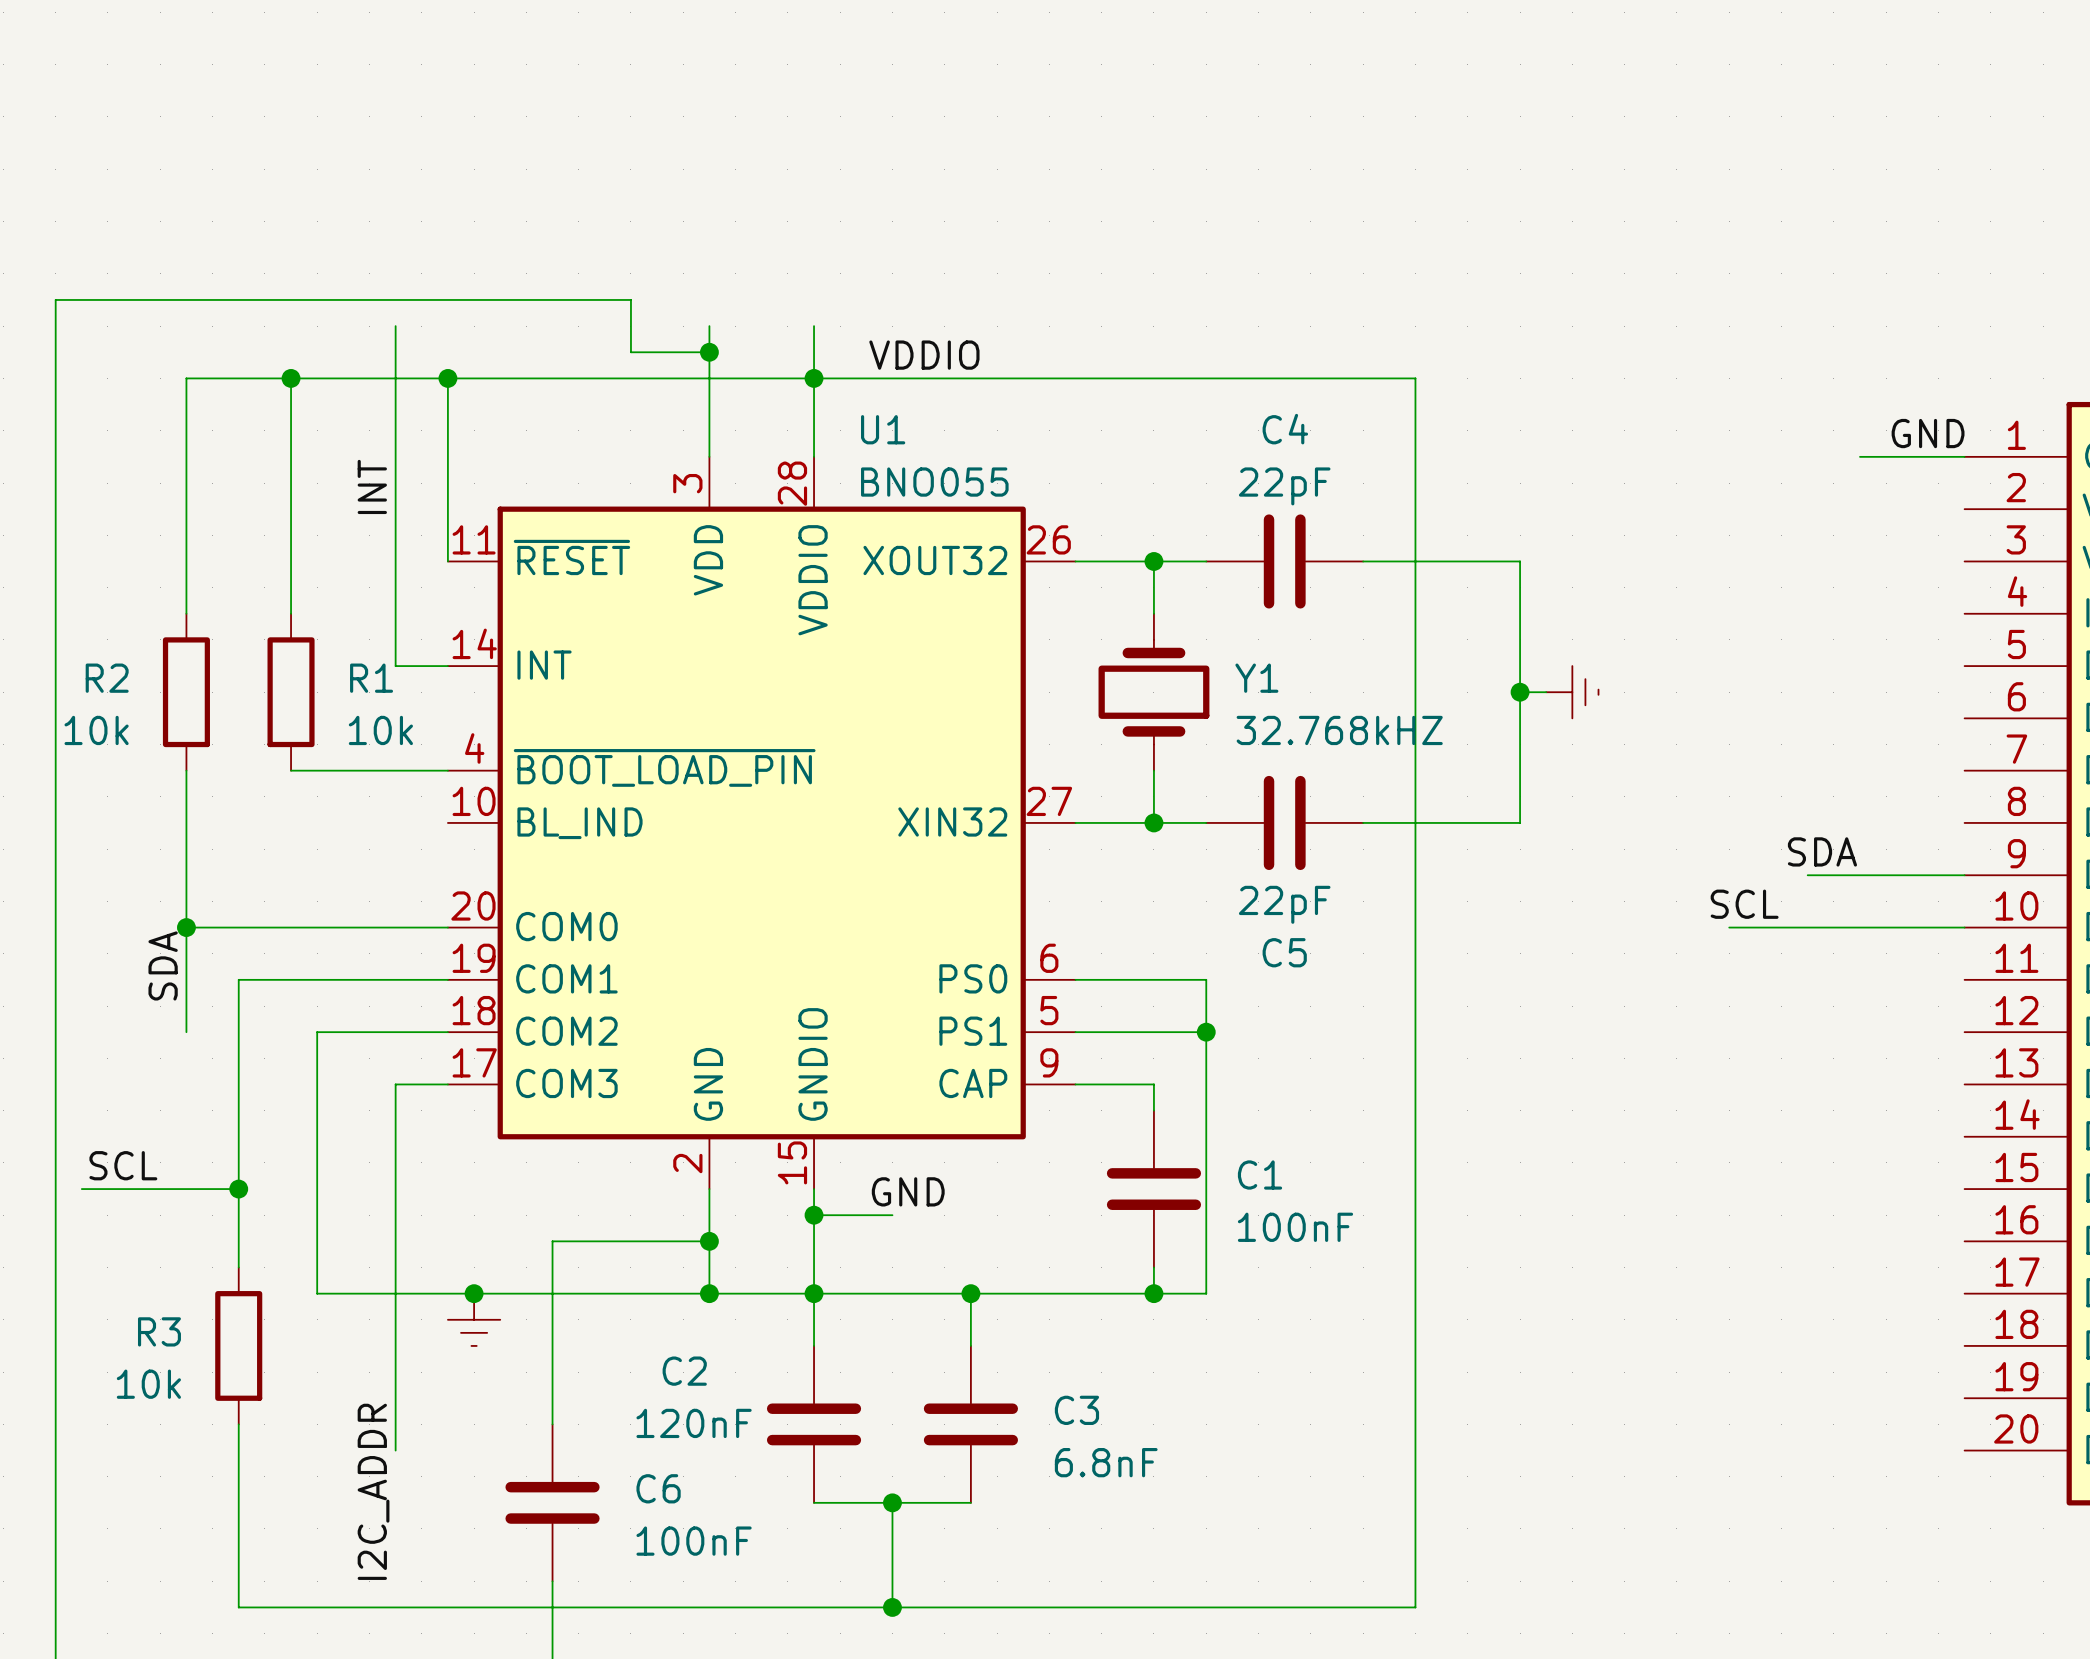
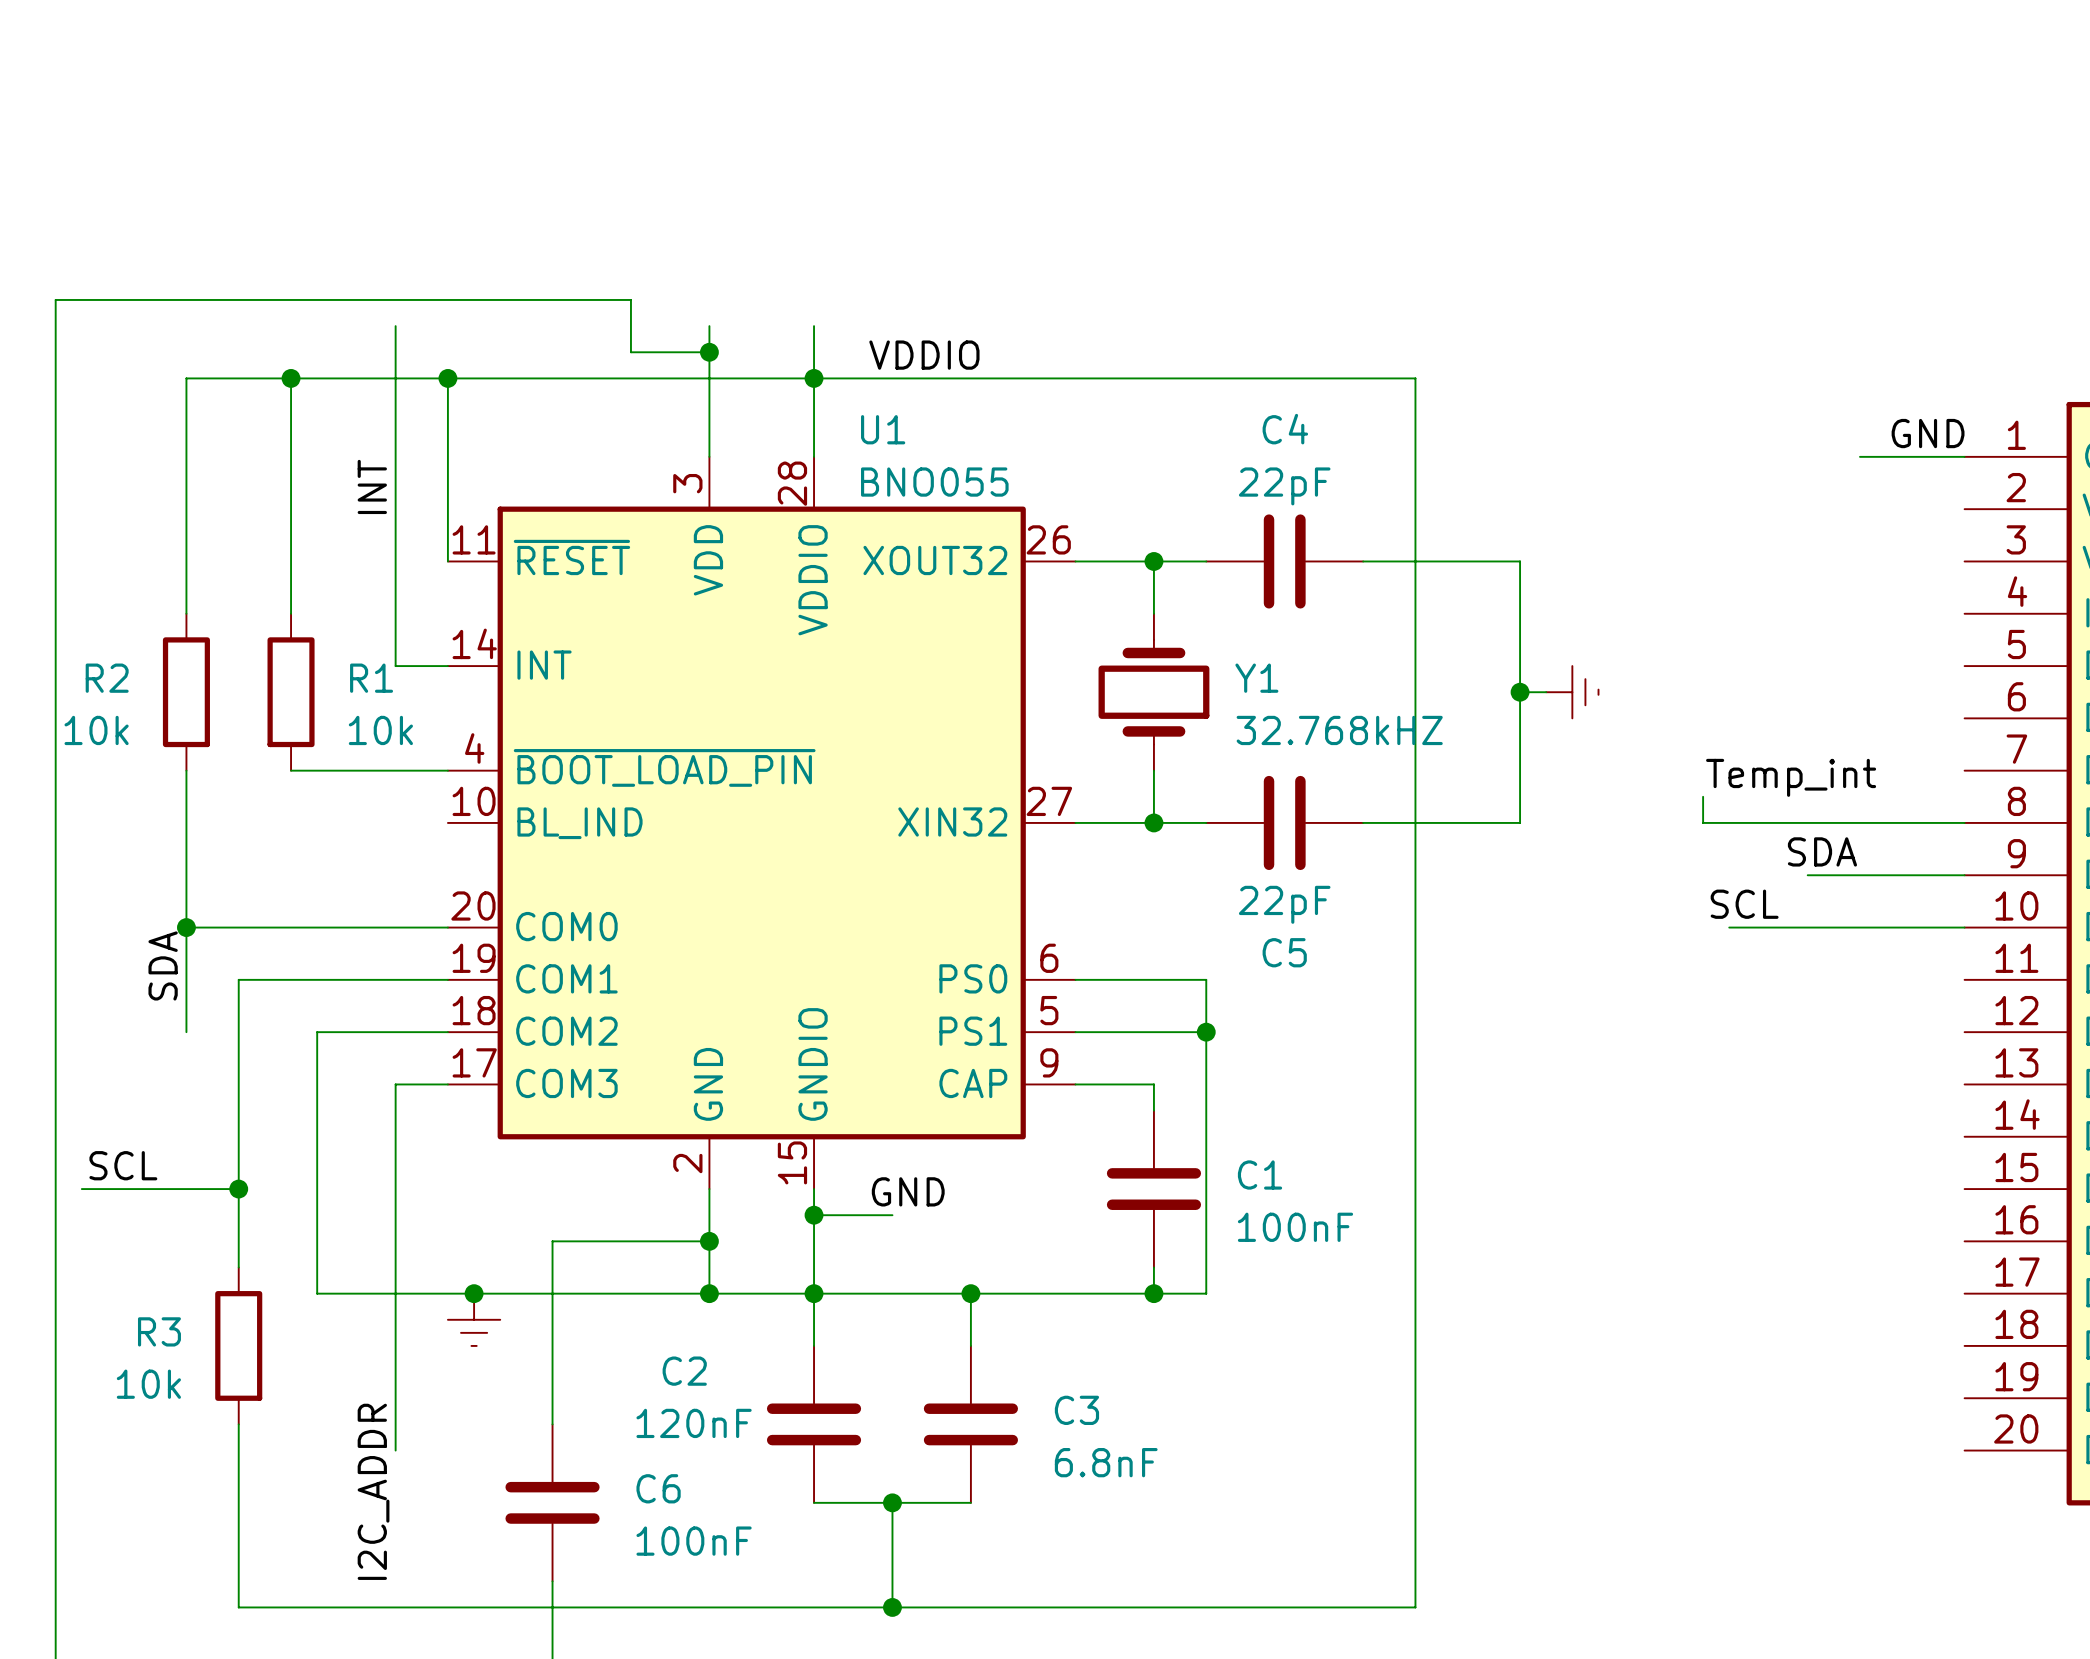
label: none -> Temp_int (1791, 777)
wire: none -> (1703, 796) (1703, 822) (1964, 822)

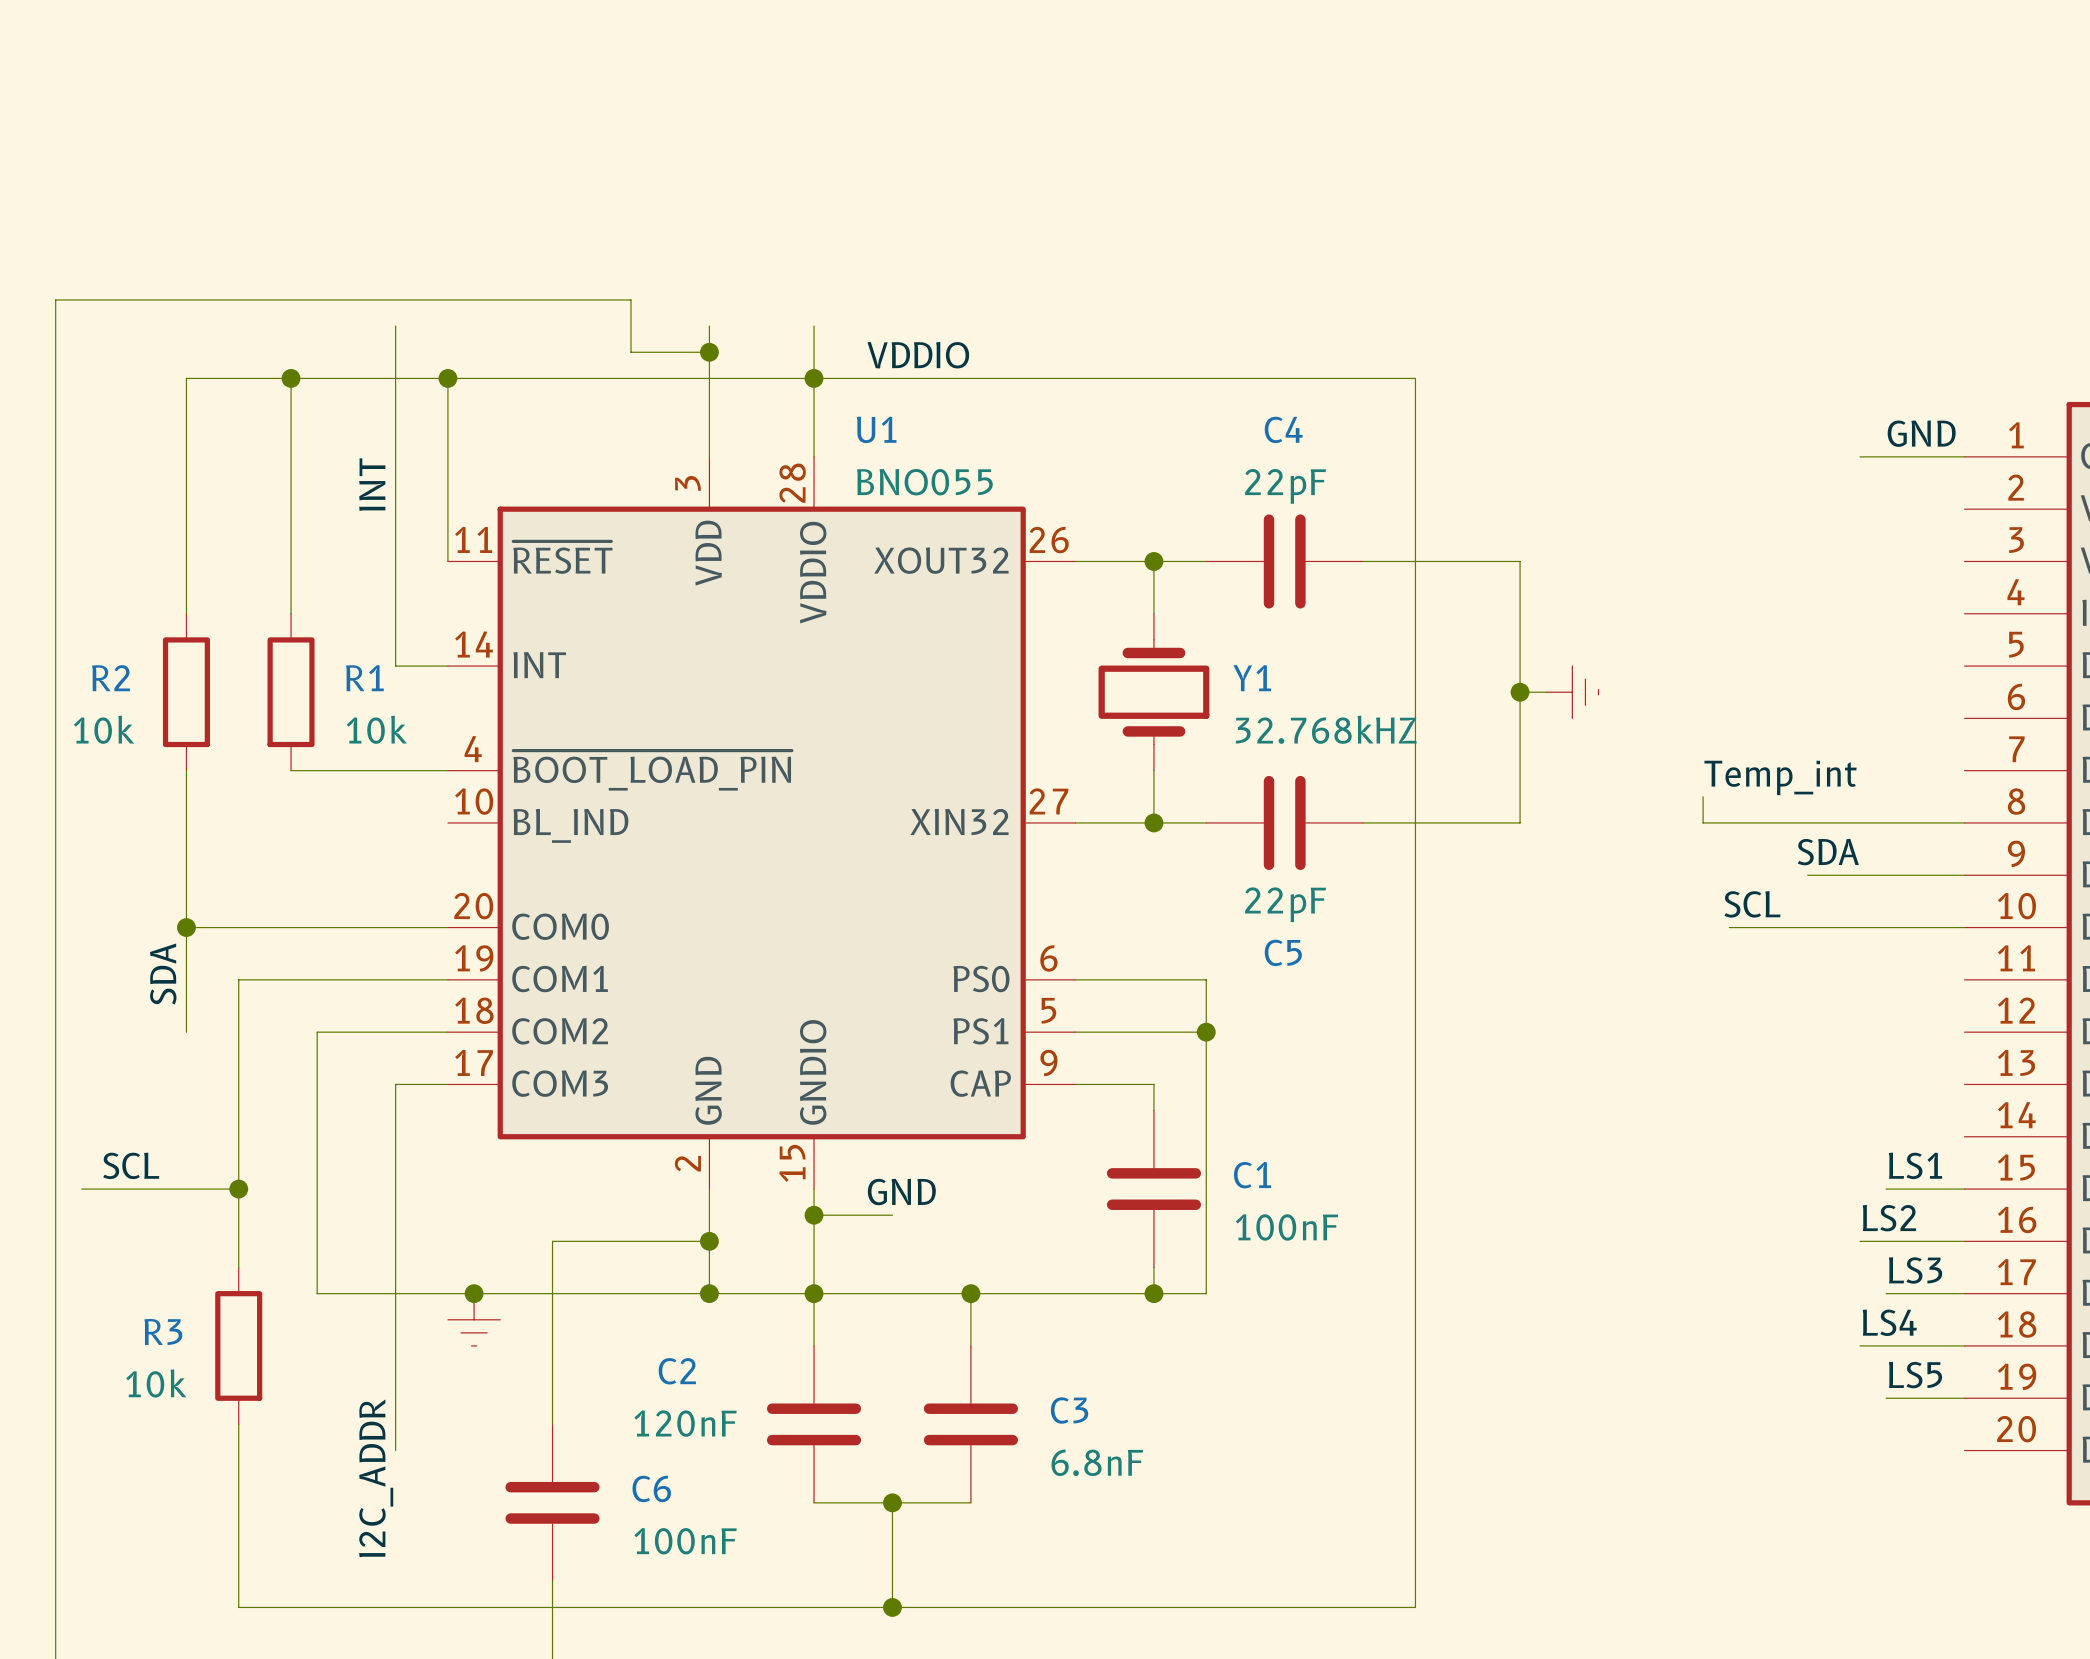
label: none -> LS1 (1915, 1165)
wire: none -> (1886, 1189) (1964, 1189)
label: none -> LS2 (1889, 1218)
wire: none -> (1860, 1241) (1964, 1241)
label: none -> LS3 (1915, 1270)
wire: none -> (1886, 1293) (1964, 1293)
label: none -> LS4 (1889, 1322)
wire: none -> (1860, 1345) (1964, 1345)
label: none -> LS5 (1915, 1375)
wire: none -> (1886, 1398) (1964, 1398)

